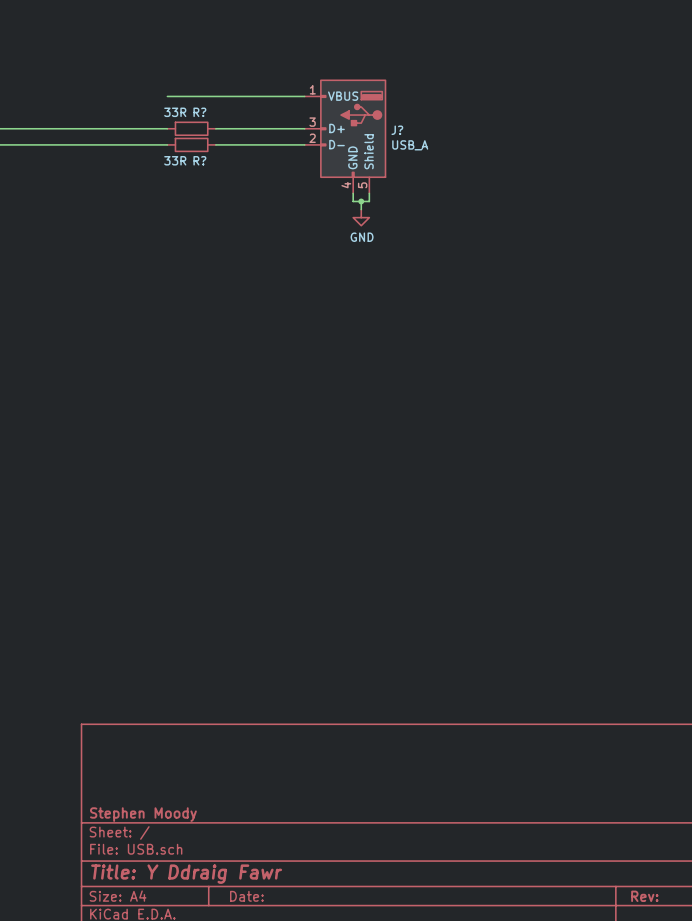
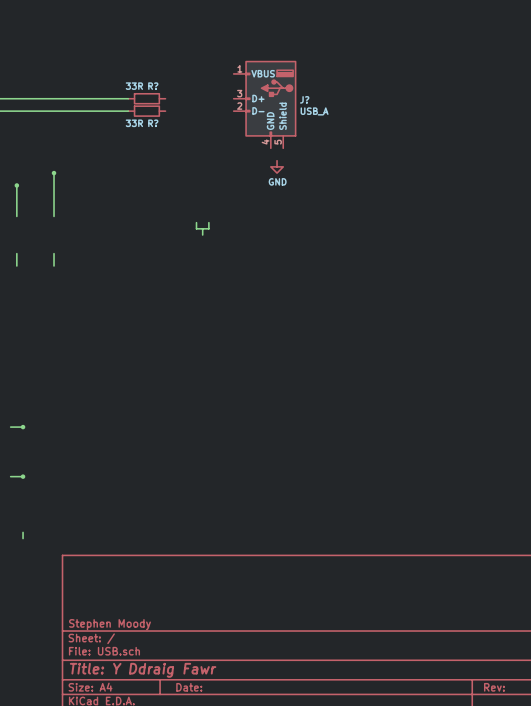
wire: (167, 96) (304, 96) -> none
wire: (215, 128) (304, 128) -> none
wire: (215, 144) (304, 144) -> none
wire: (353, 193) (353, 201) (369, 201) (369, 193) -> (196, 222) (196, 228) (208, 228) (208, 222)
wire: (361, 201) (361, 209) -> (202, 228) (202, 235)
junction: (361, 201) -> none
wire: none -> (54, 173) (54, 216)
junction: none -> (54, 173)
wire: none -> (16, 185) (16, 216)
junction: none -> (16, 185)
wire: none -> (16, 253) (16, 266)
wire: none -> (54, 253) (54, 266)
wire: none -> (10, 427) (23, 427)
junction: none -> (23, 427)
wire: none -> (10, 476) (23, 476)
junction: none -> (23, 476)
wire: none -> (23, 532) (23, 538)

